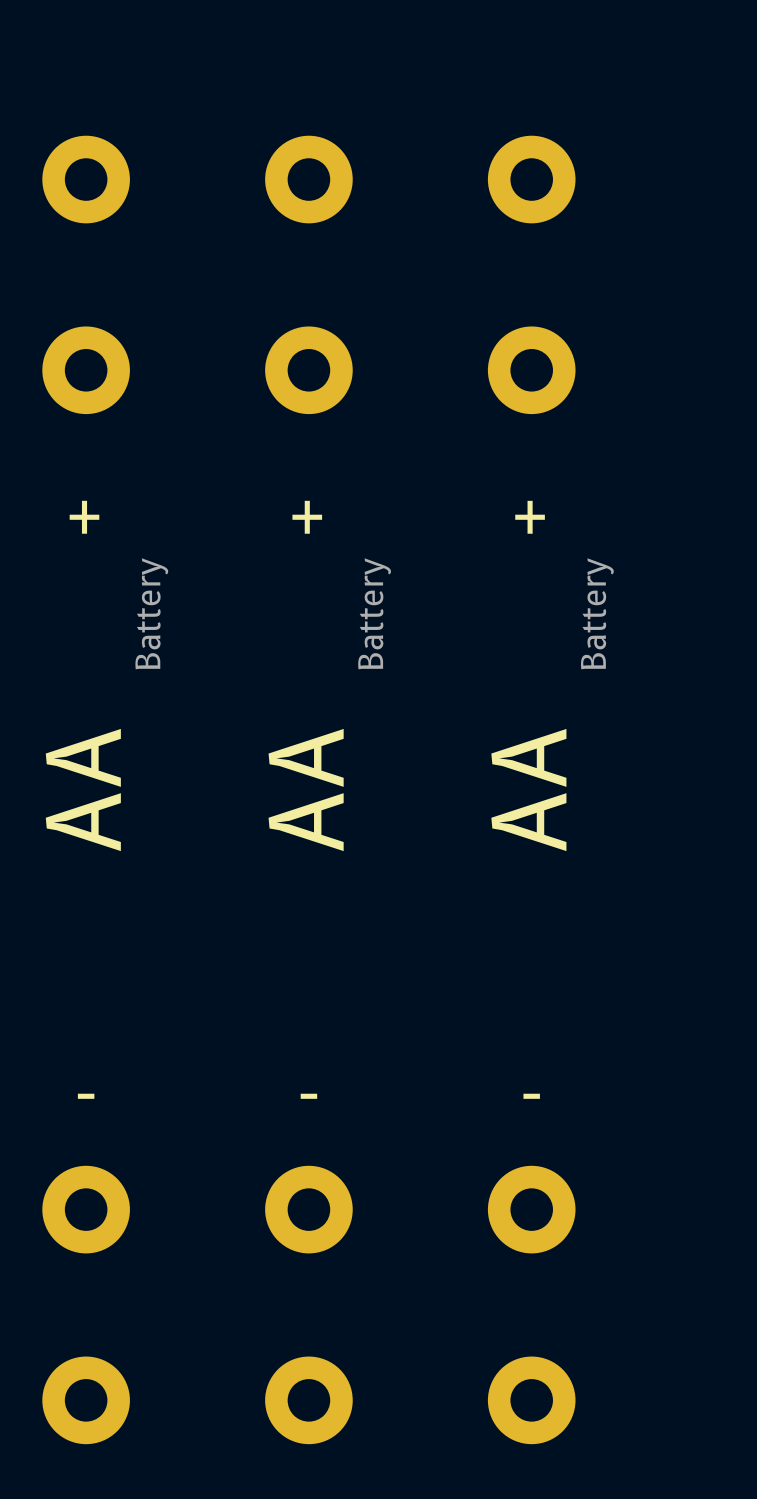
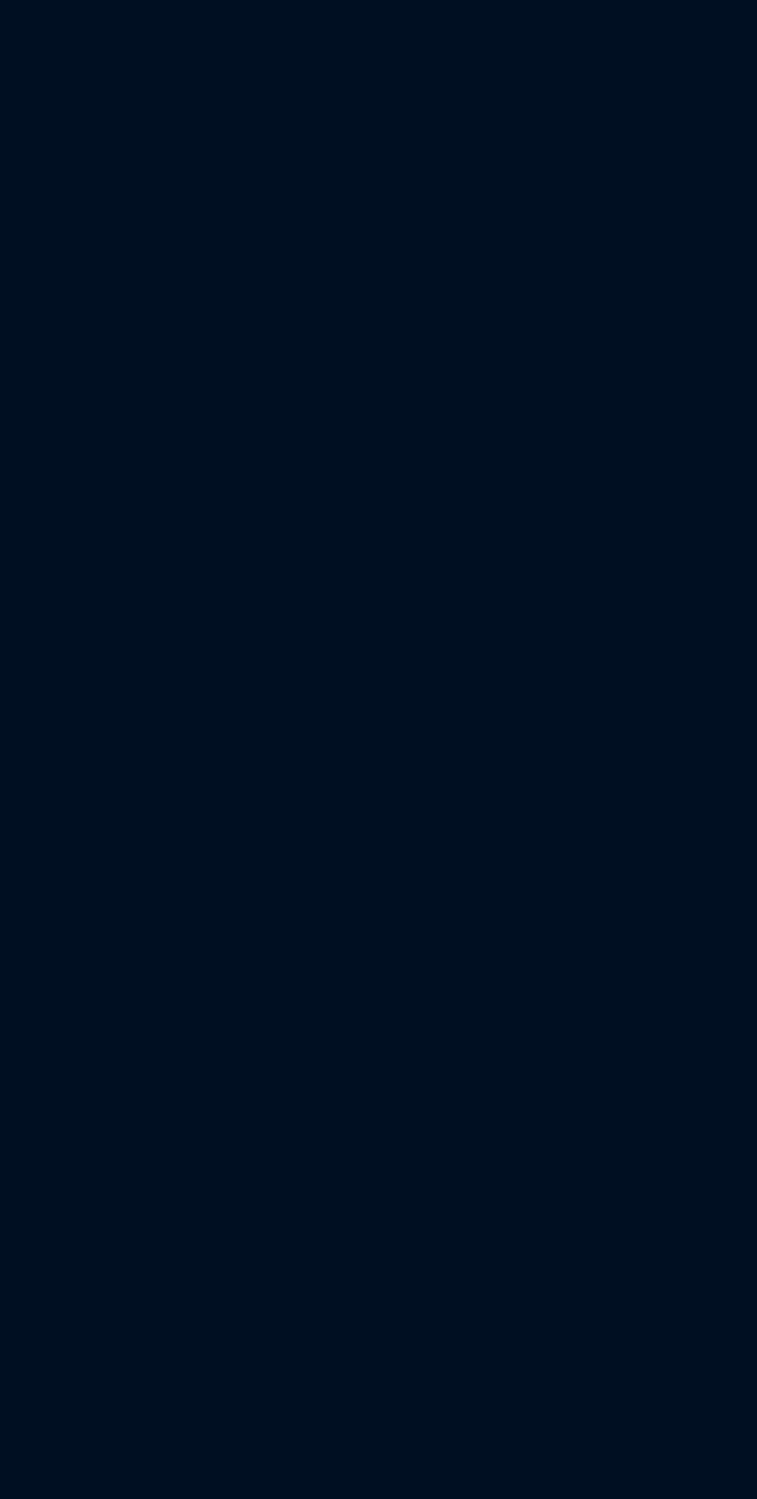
part: Battery (86, 789) -> none
part: Battery (308, 789) -> none
part: Battery (531, 789) -> none

